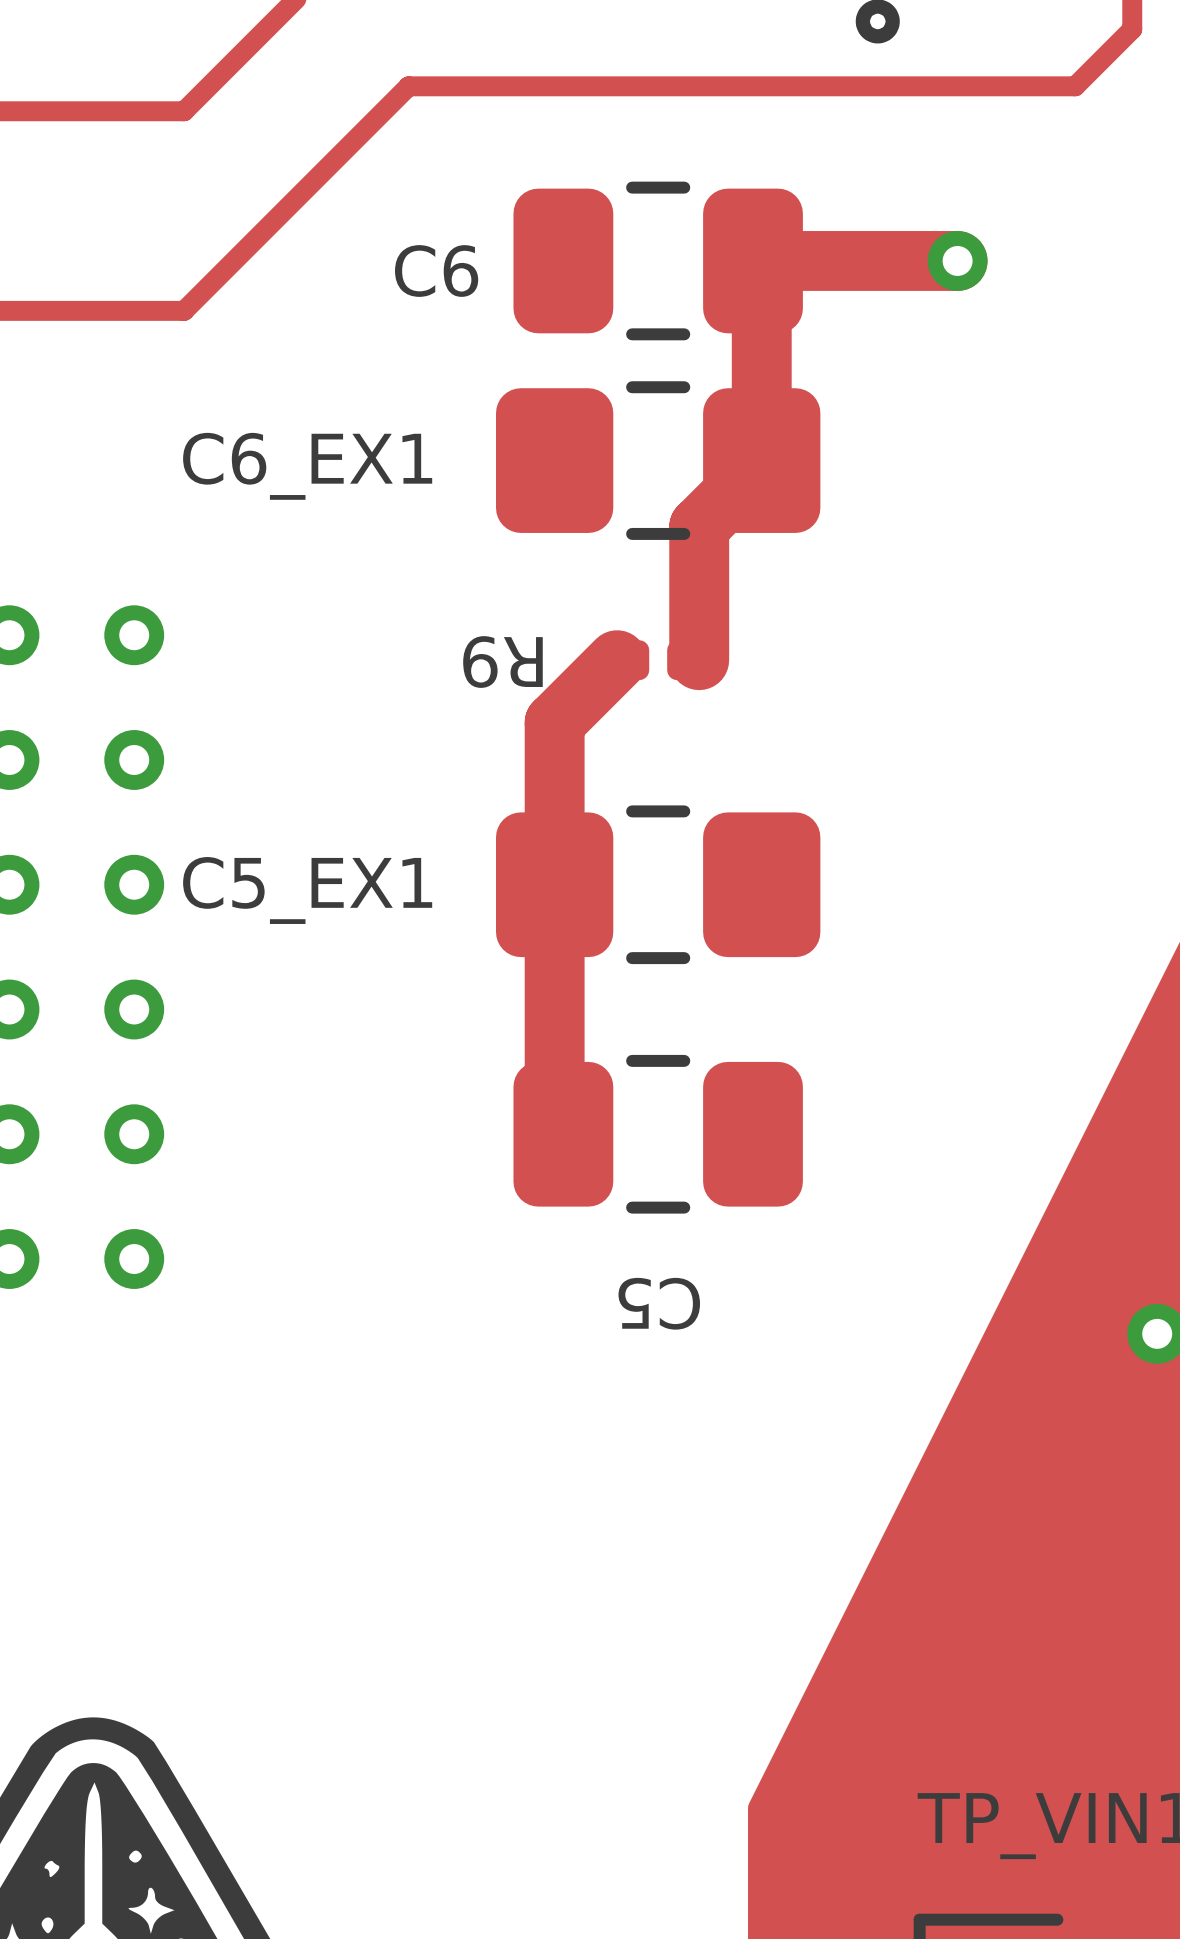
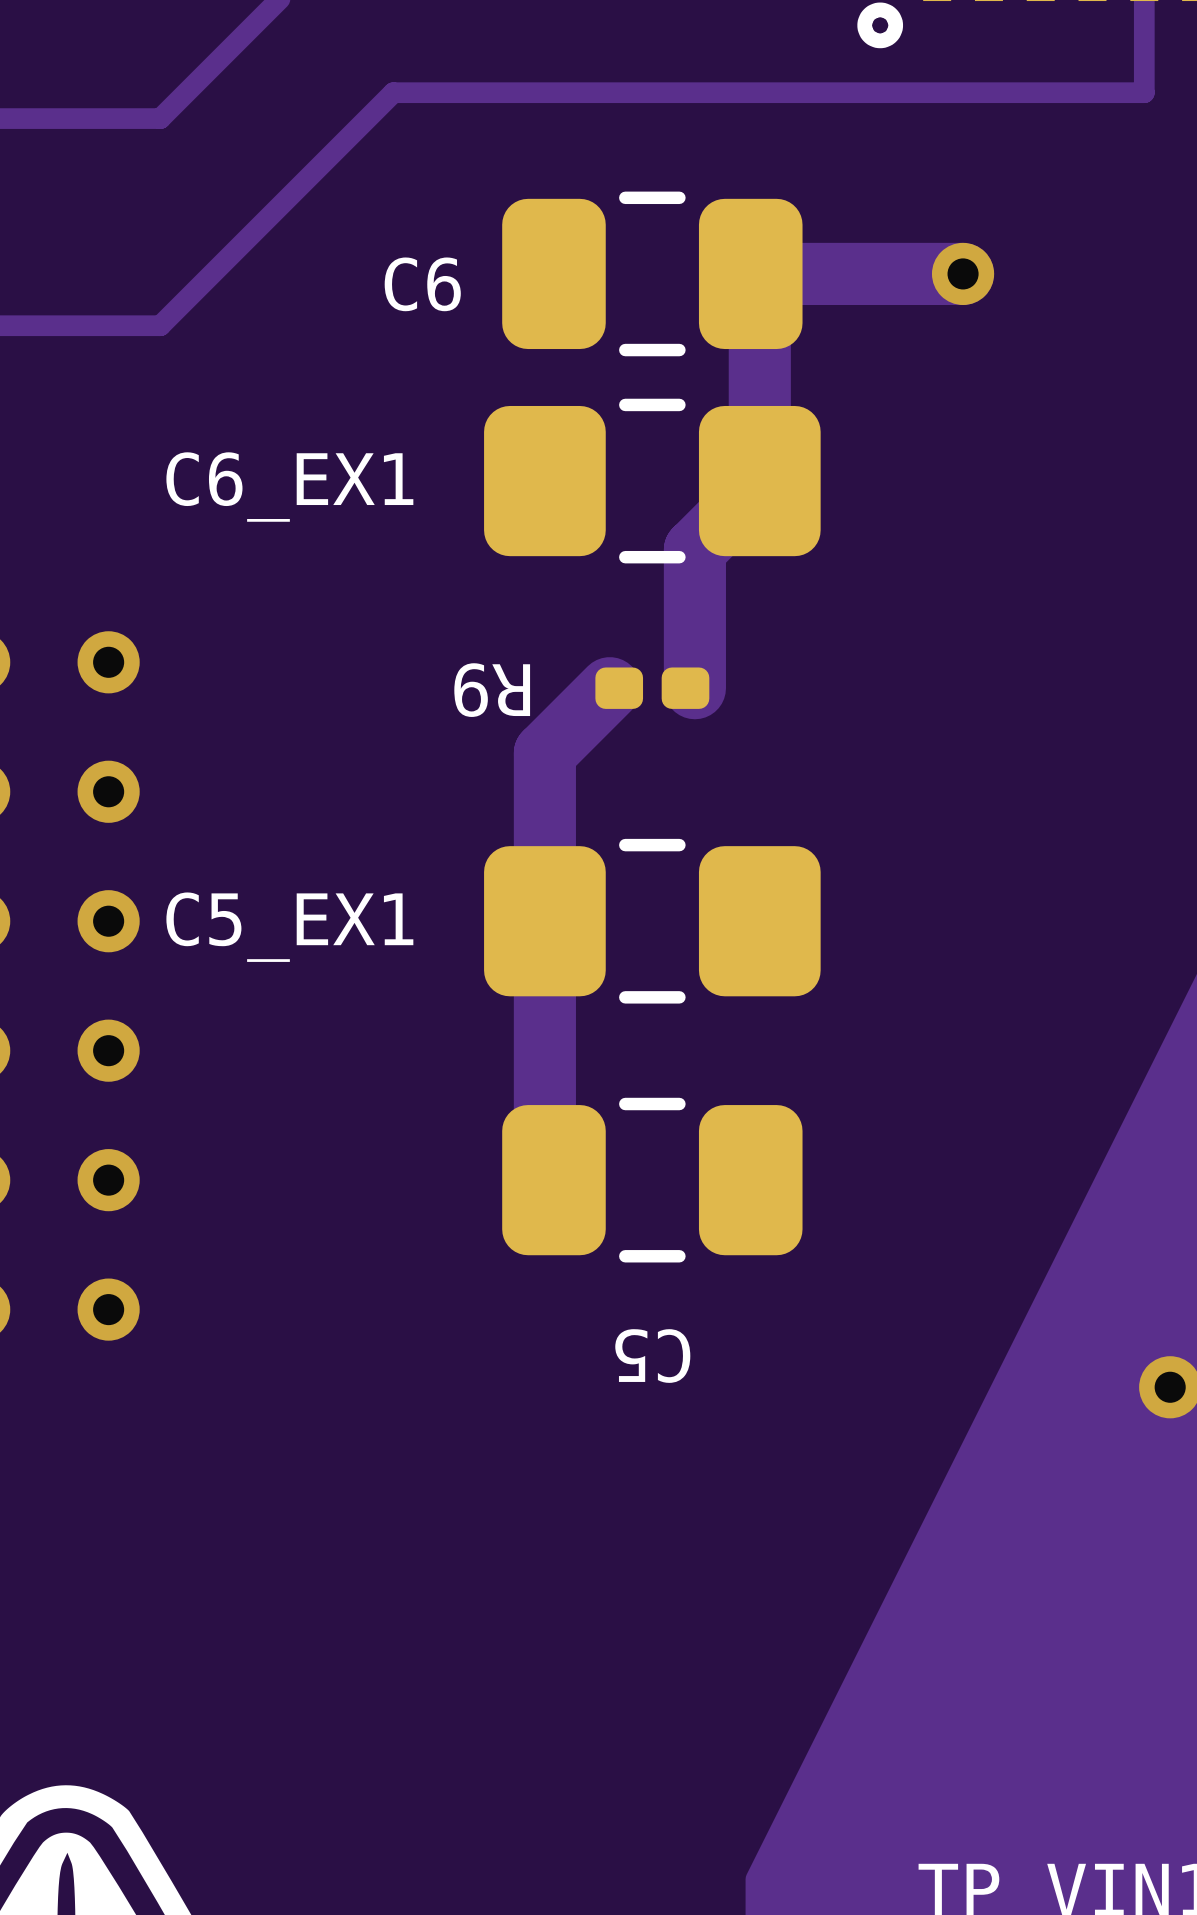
track: (1132, 29) (1075, 86) -> (1144, 33) (1144, 92) (1085, 92)

